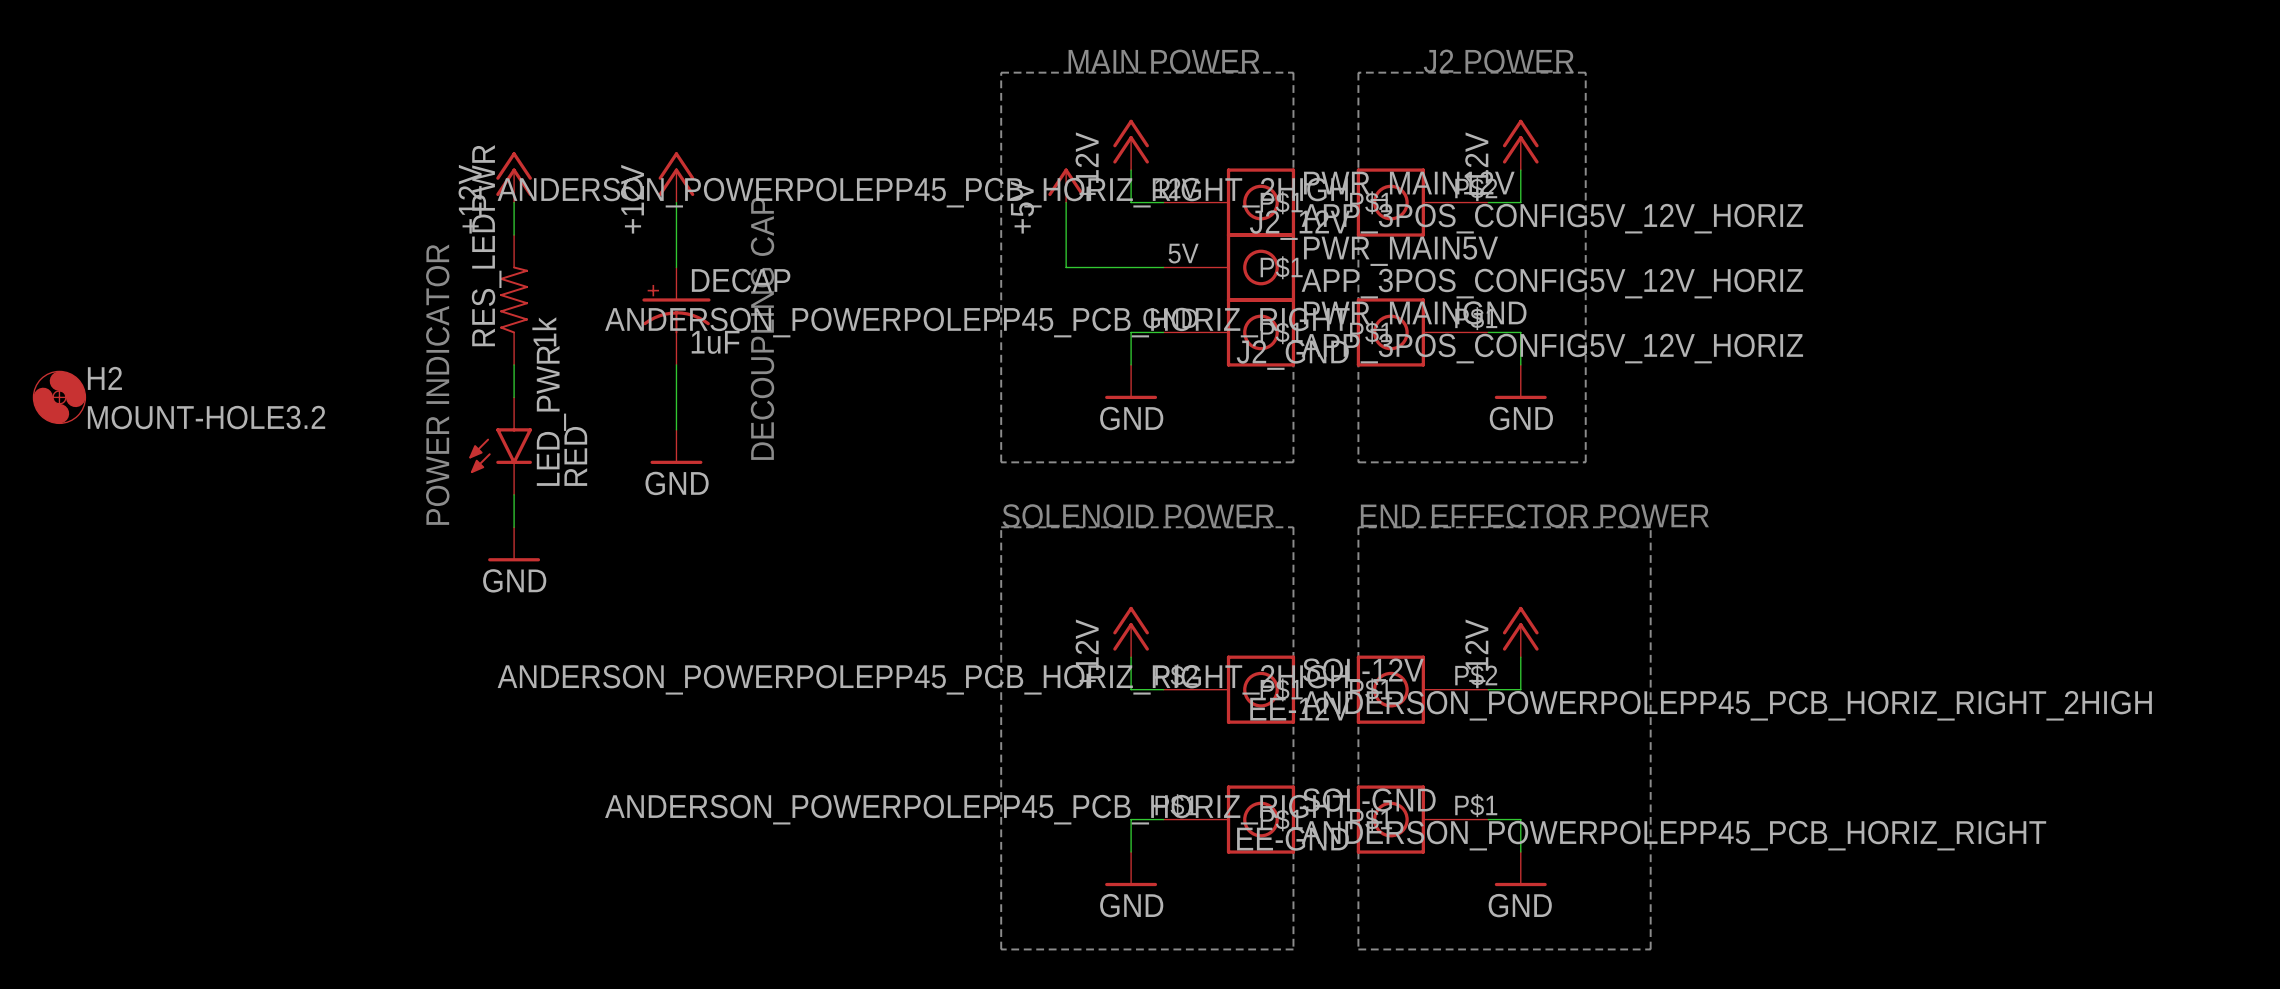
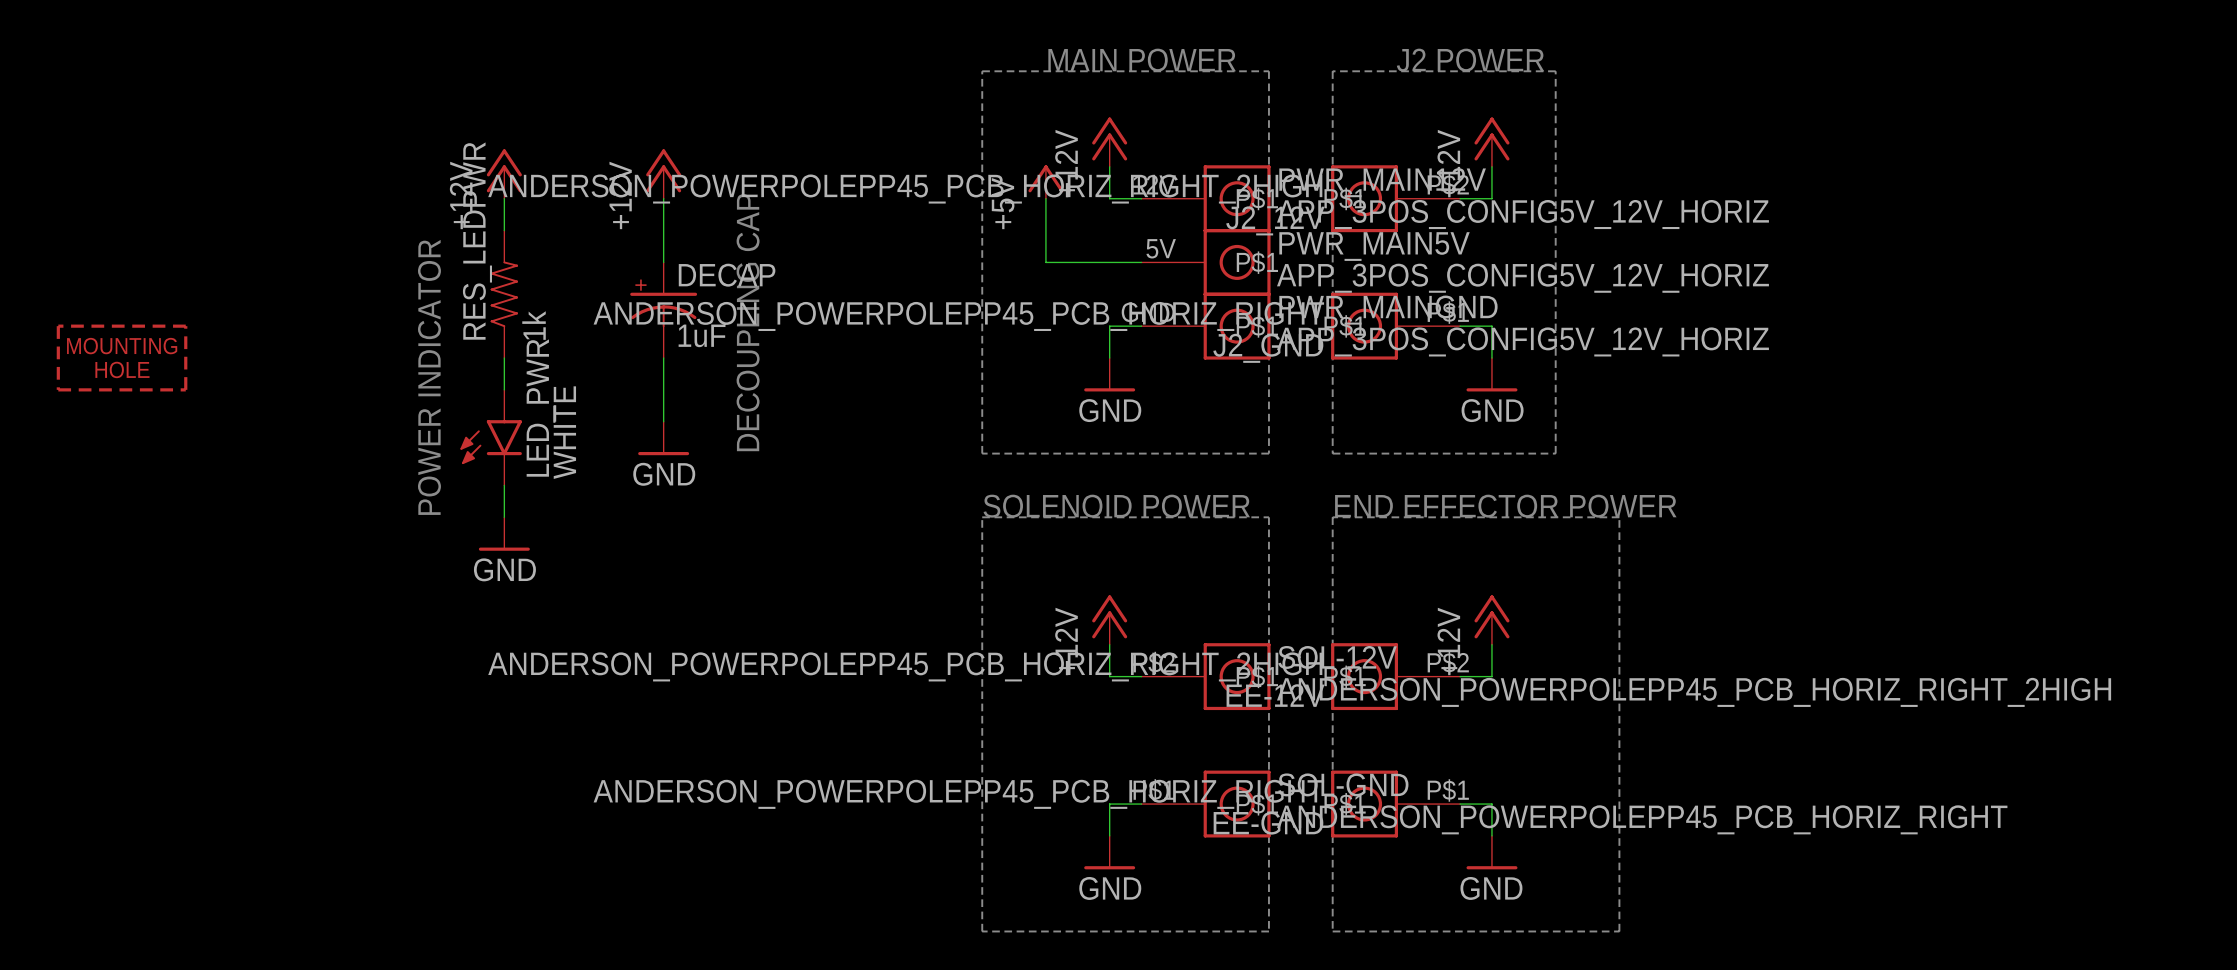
part: none -> (122, 358)
H2: MOUNT-HOLE3.2 (59, 397) -> none
LED_PWR value: RED (575, 456) -> WHITE (564, 432)

